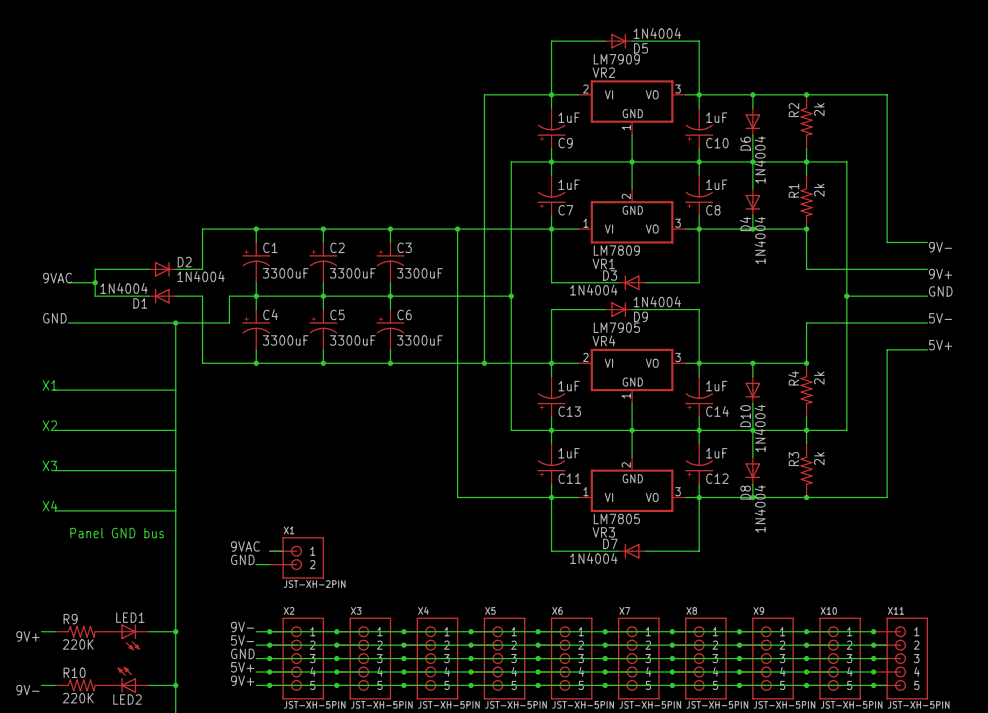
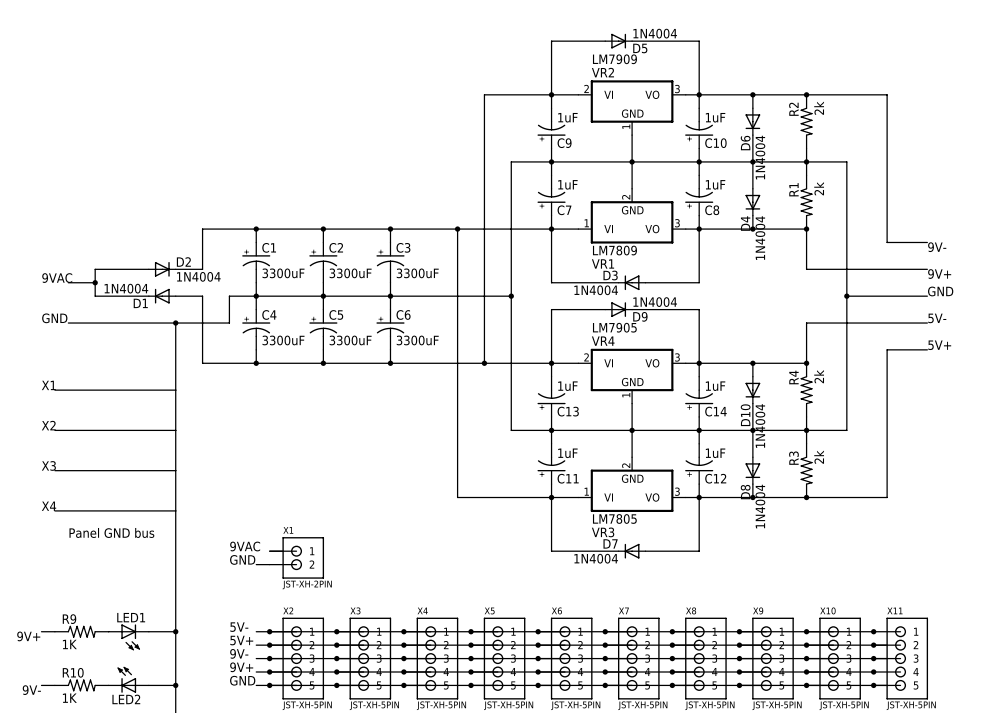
label: 9V- (242, 627) -> 5V- (239, 627)
label: 5V- (242, 640) -> 5V+ (241, 640)
R9 value: 220K (78, 644) -> 1K (69, 644)
label: GND (242, 653) -> 9V- (239, 653)
label: 5V+ (242, 667) -> 9V+ (241, 667)
label: 9V+ (242, 680) -> GND (242, 680)
R10 value: 220K (78, 698) -> 1K (69, 698)

